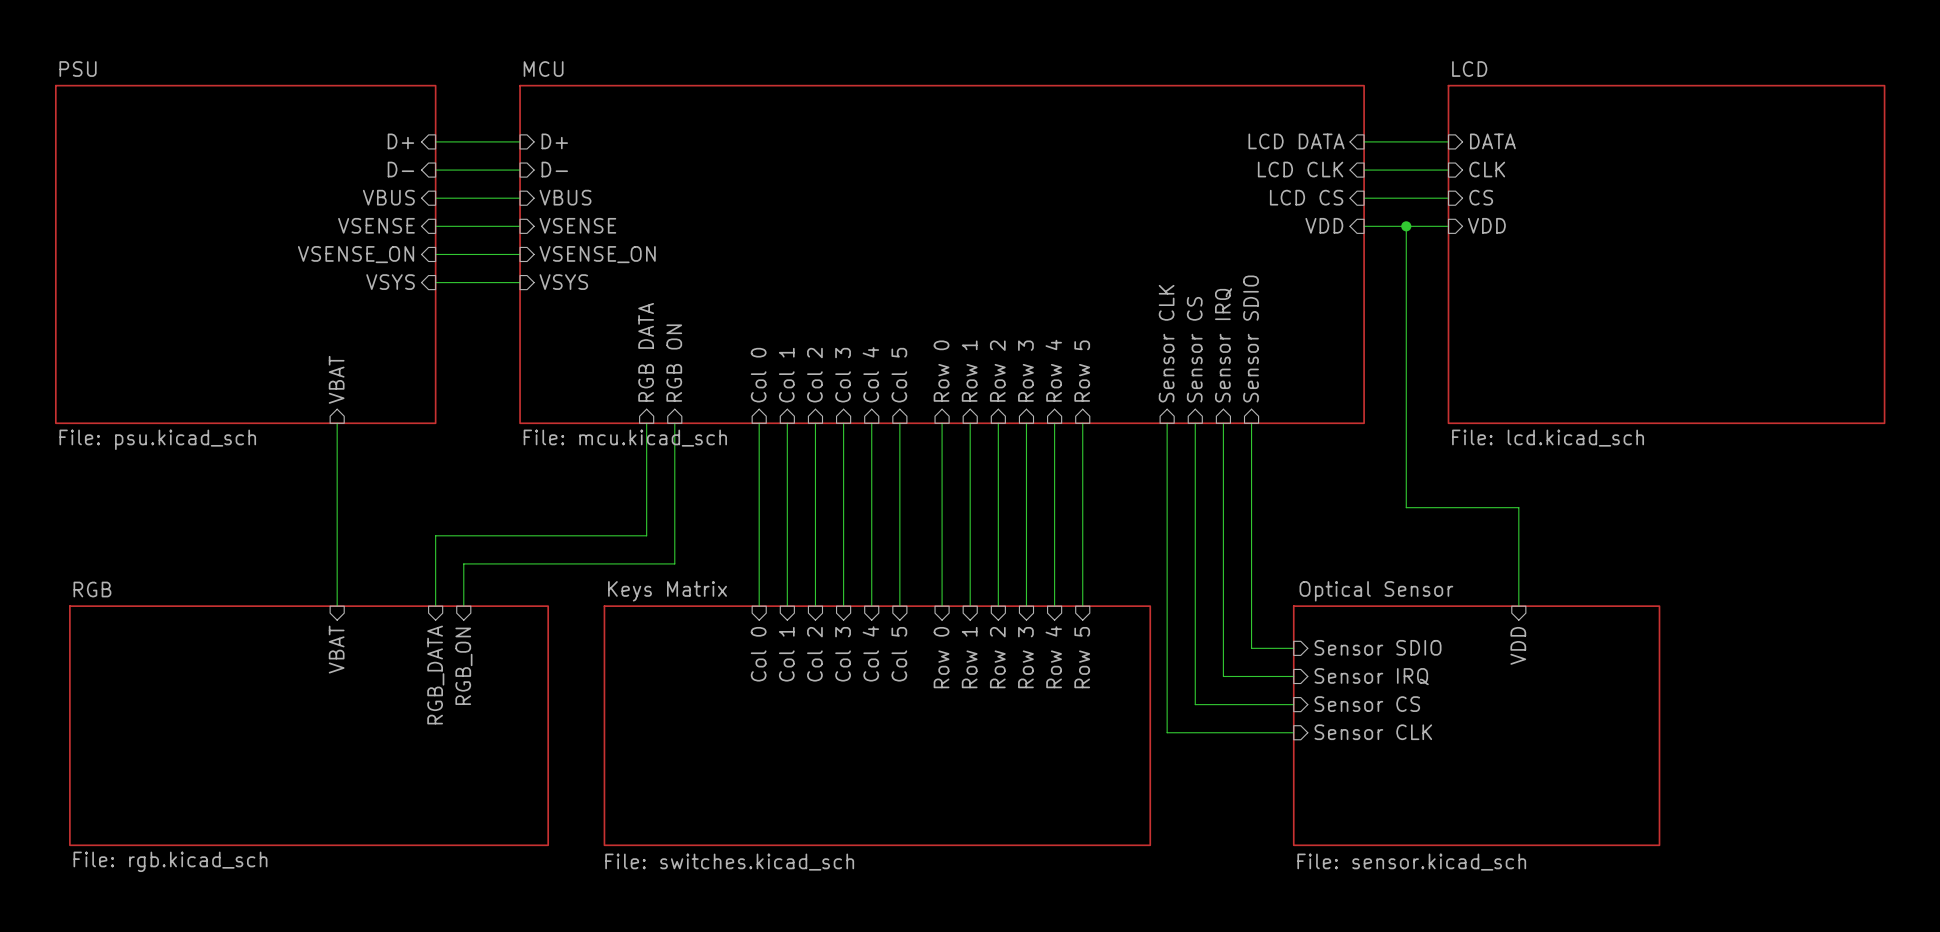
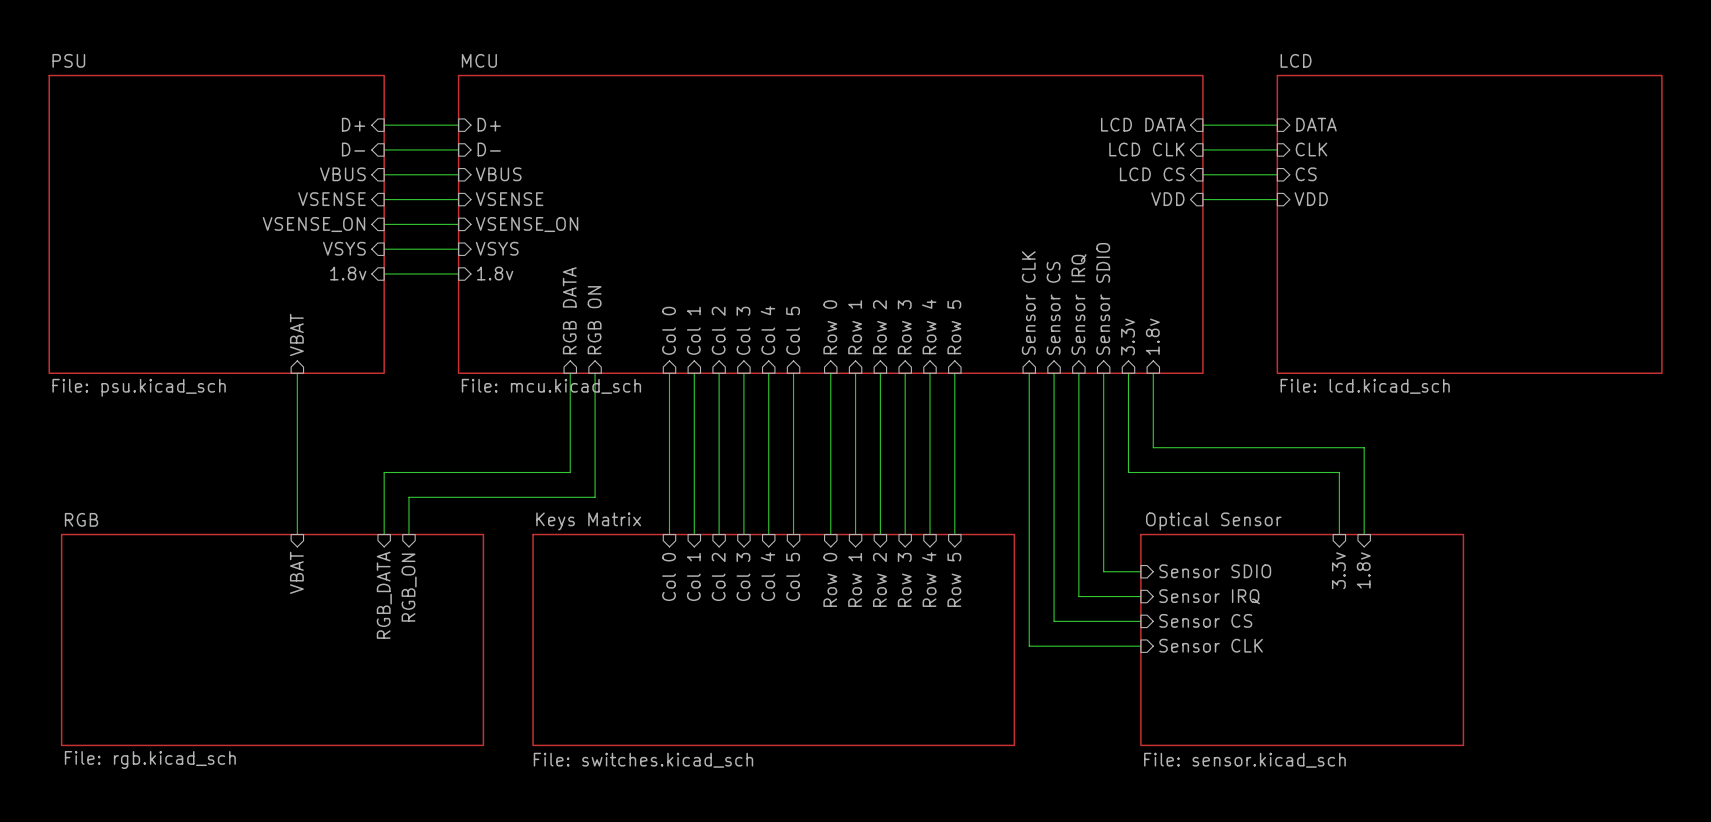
wire: (1406, 226) (1406, 507) -> (1153, 373) (1153, 447) (1240, 447)
junction: (1406, 226) -> none
sheet pin: none -> 1.8v (348, 273)
wire: none -> (384, 274) (458, 274)
sheet pin: none -> 1.8v (495, 273)
sheet pin: none -> 1.8v (1152, 336)
sheet pin: none -> 3.3v (1128, 337)
wire: none -> (1128, 373) (1128, 472) (1339, 472)
wire: (1518, 507) (1518, 535) -> (1339, 447) (1364, 447) (1364, 534)
sheet pin: VDD (1518, 645) -> 3.3v (1338, 570)
sheet pin: none -> 1.8v (1363, 570)

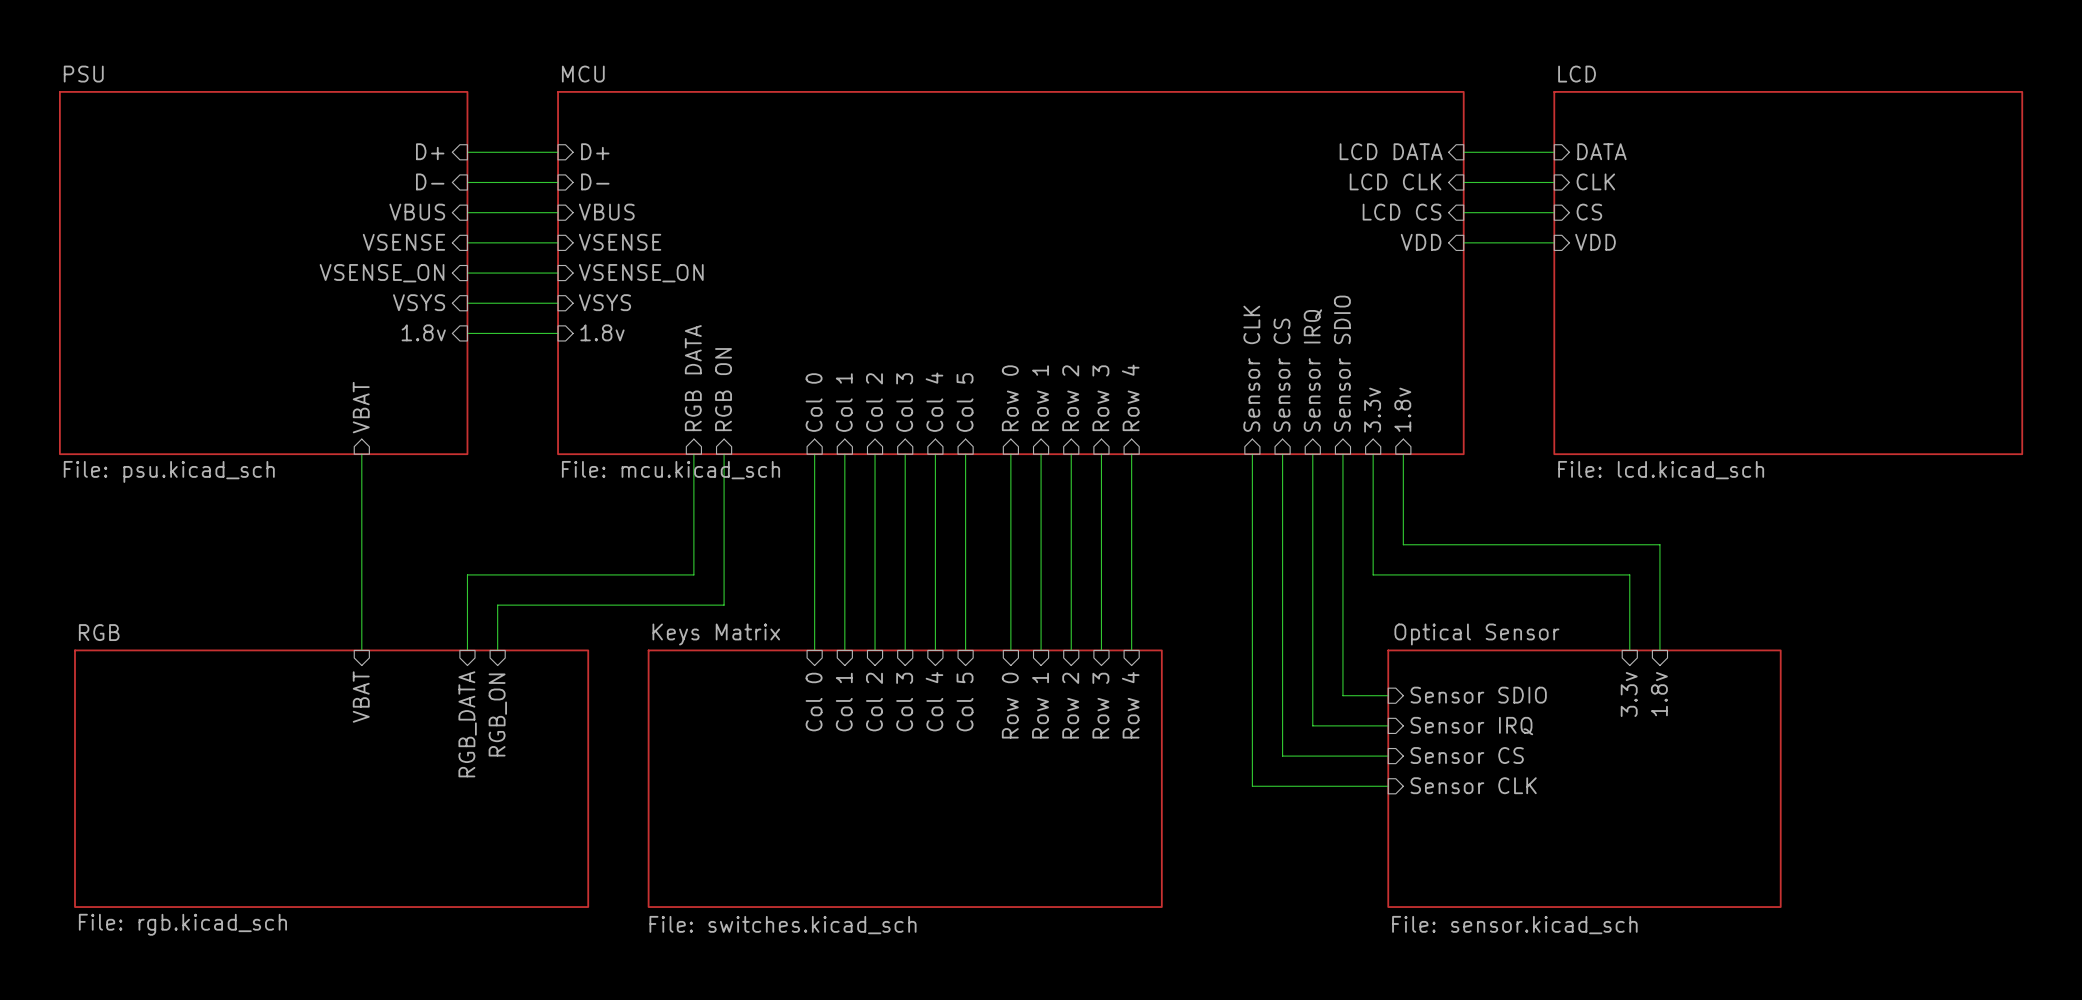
sheet pin: Row 5 (954, 327) -> none
wire: (954, 373) (954, 534) -> none
sheet pin: Row 5 (954, 579) -> none
sheet Keys Matrix: none -> File: switches.kicad_sch (905, 778)
sheet Keys Matrix: File: switches.kicad_sch (773, 639) -> none

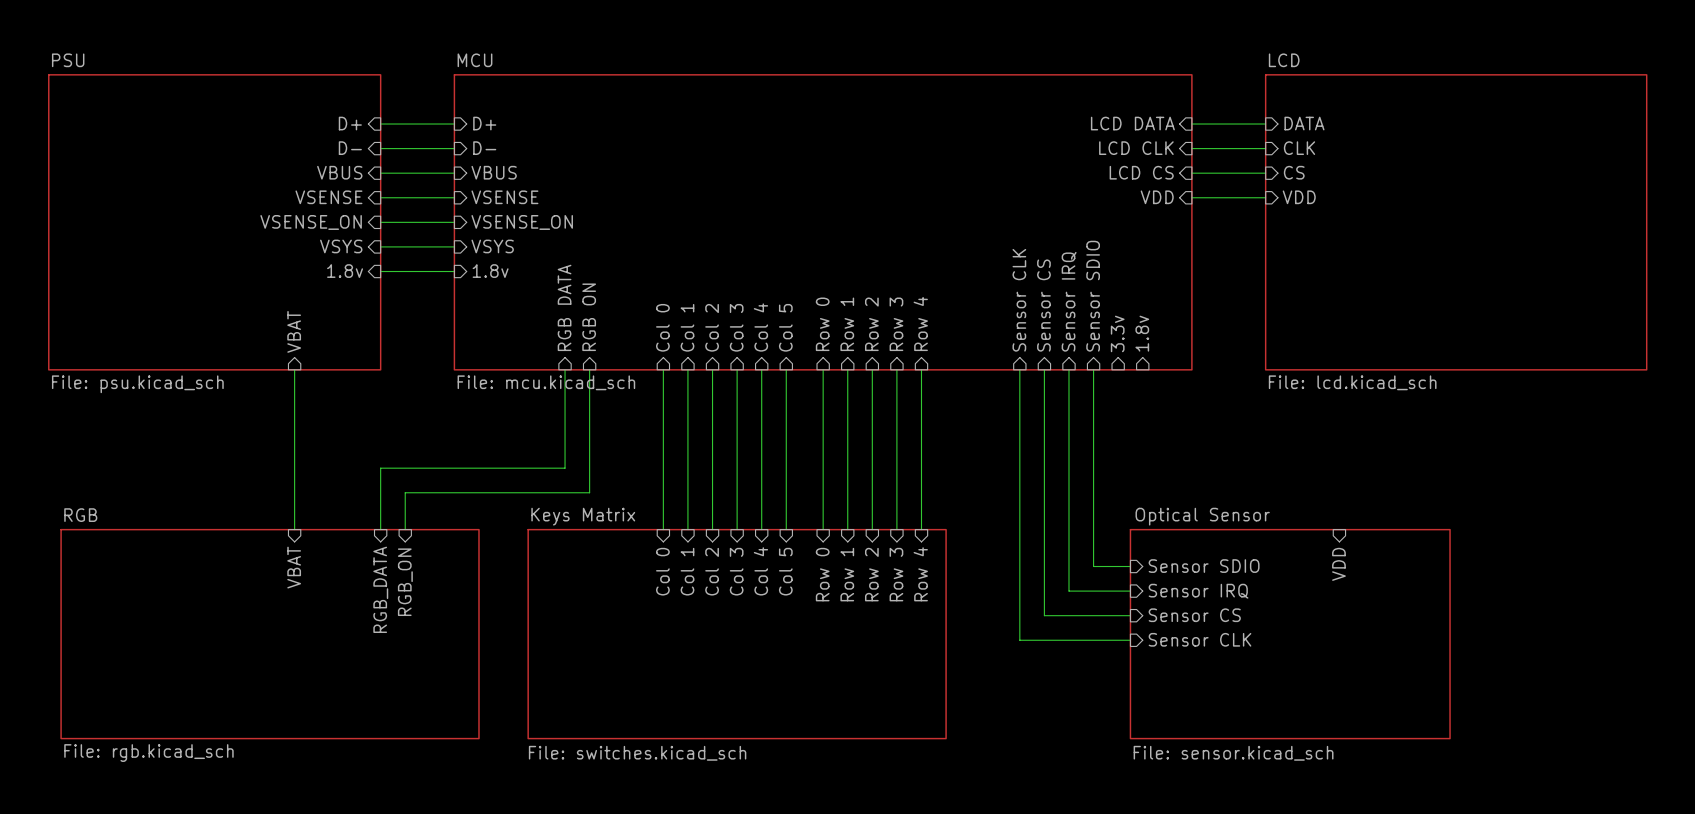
wire: (1373, 454) (1373, 574) (1629, 574) (1629, 650) -> none
wire: (1403, 454) (1403, 544) (1659, 544) (1659, 650) -> none
sheet pin: none -> VDD (1338, 564)
sheet pin: 3.3v (1629, 694) -> none
sheet pin: 1.8v (1659, 694) -> none

